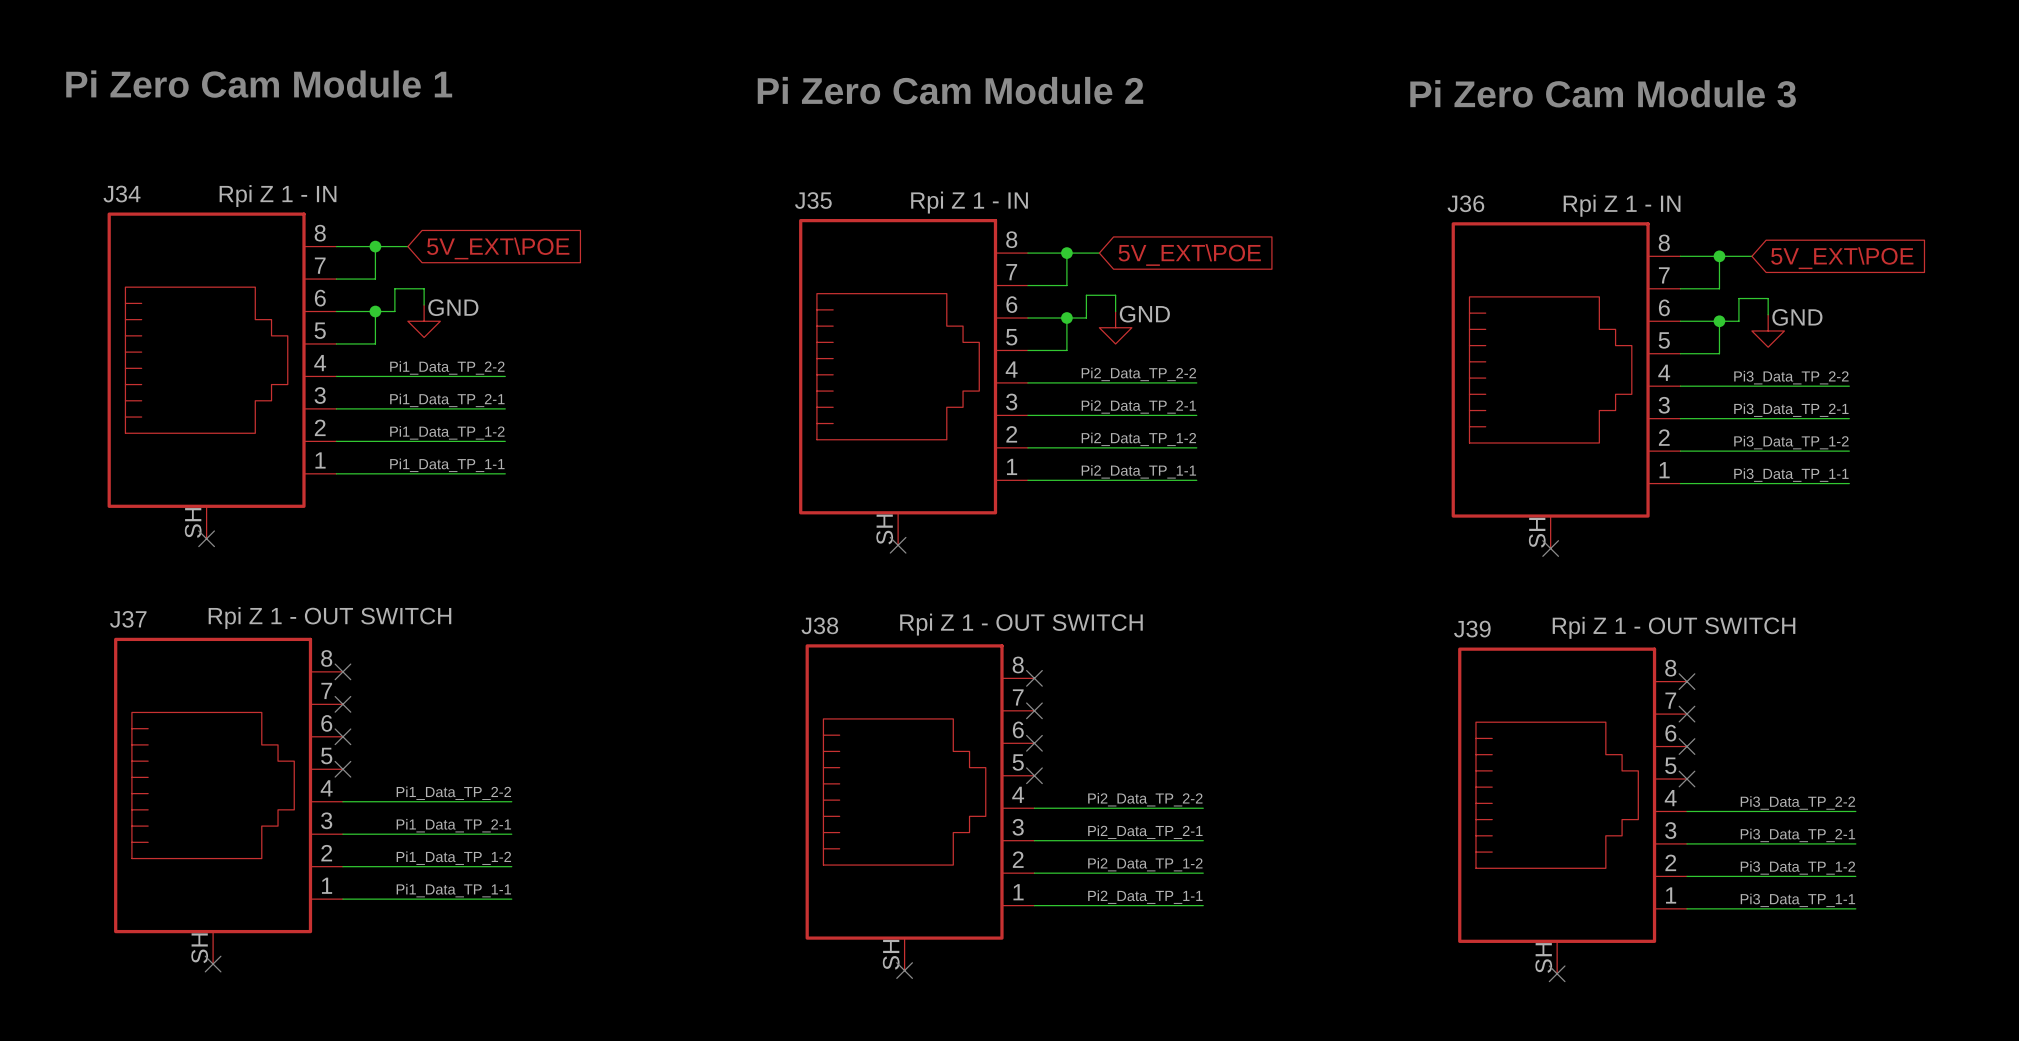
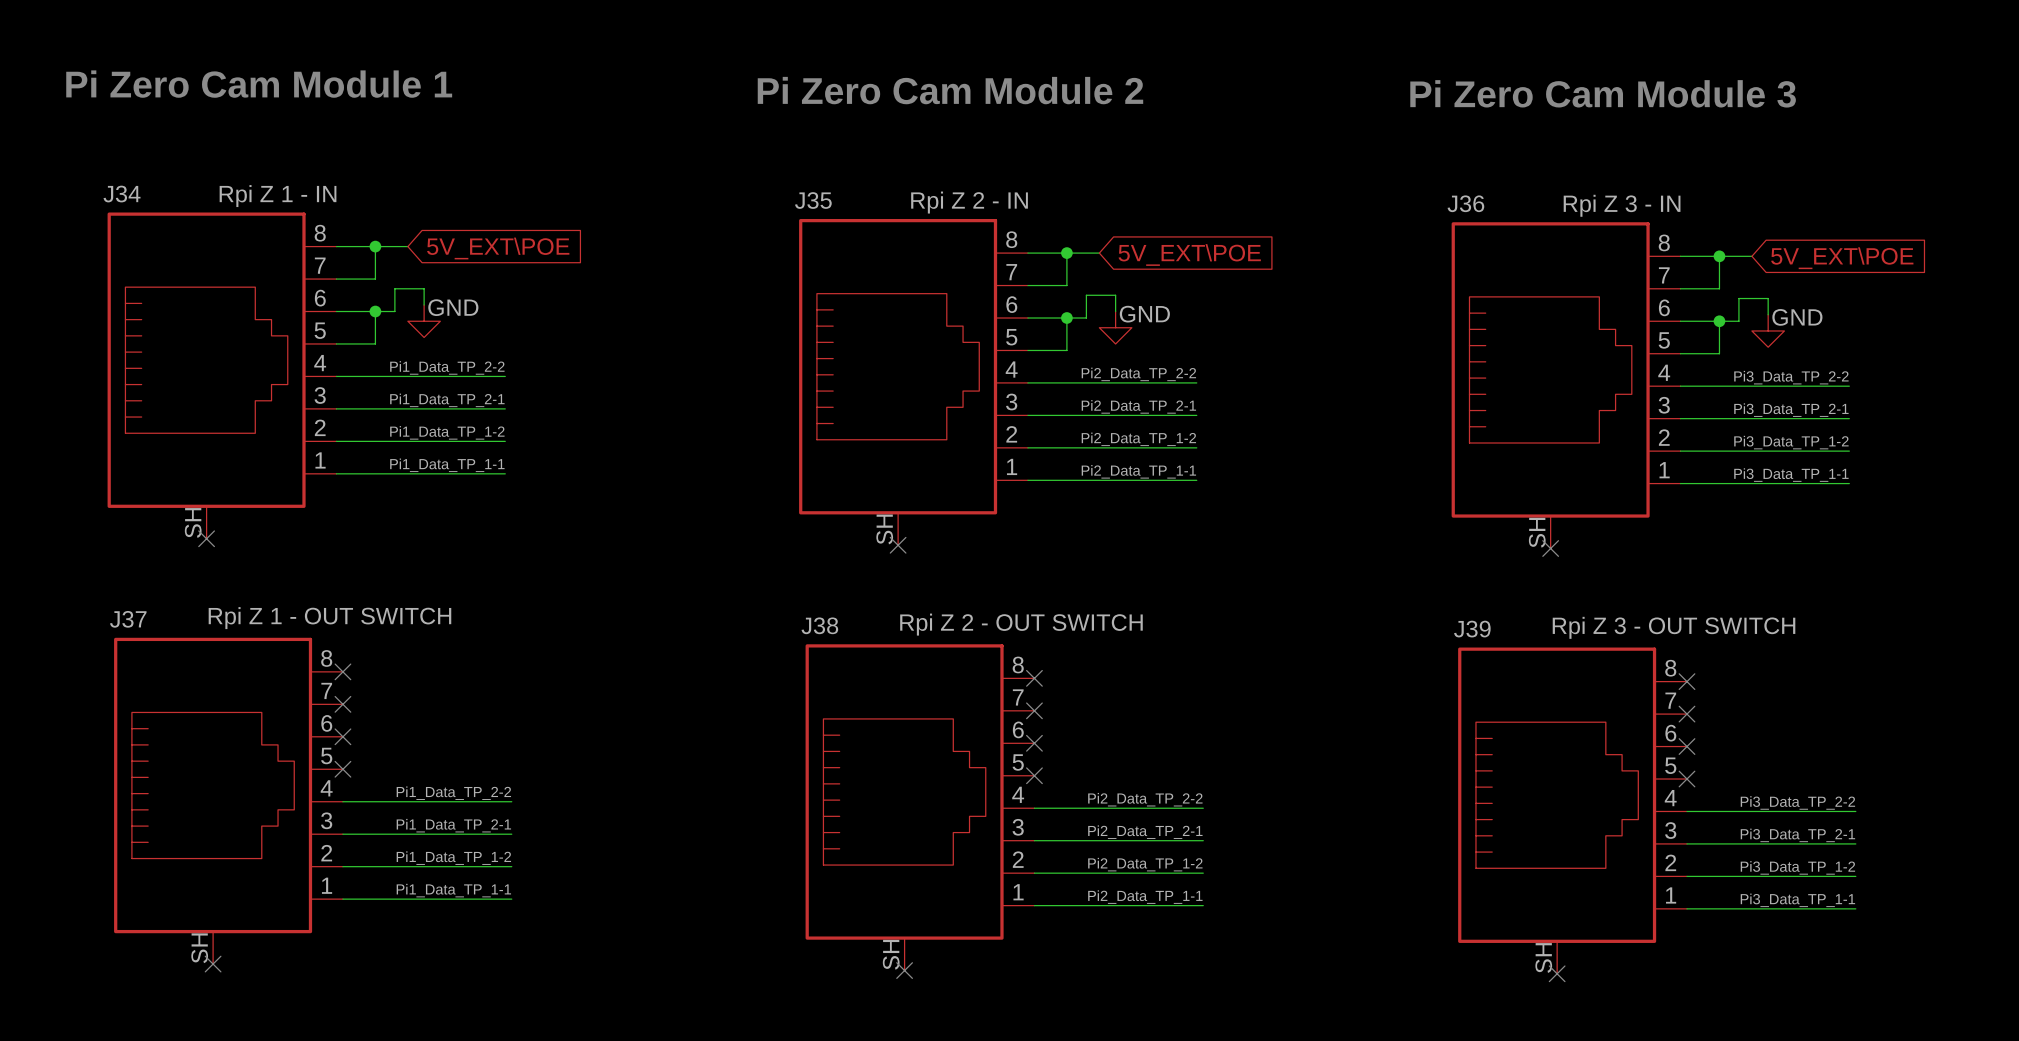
J35 value: Rpi Z 1 - IN (969, 202) -> Rpi Z 2 - IN (969, 202)
J36 value: Rpi Z 1 - IN (1622, 205) -> Rpi Z 3 - IN (1622, 205)
J38 value: Rpi Z 1 - OUT SWITCH (1021, 624) -> Rpi Z 2 - OUT SWITCH (1021, 624)
J39 value: Rpi Z 1 - OUT SWITCH (1674, 627) -> Rpi Z 3 - OUT SWITCH (1674, 627)

